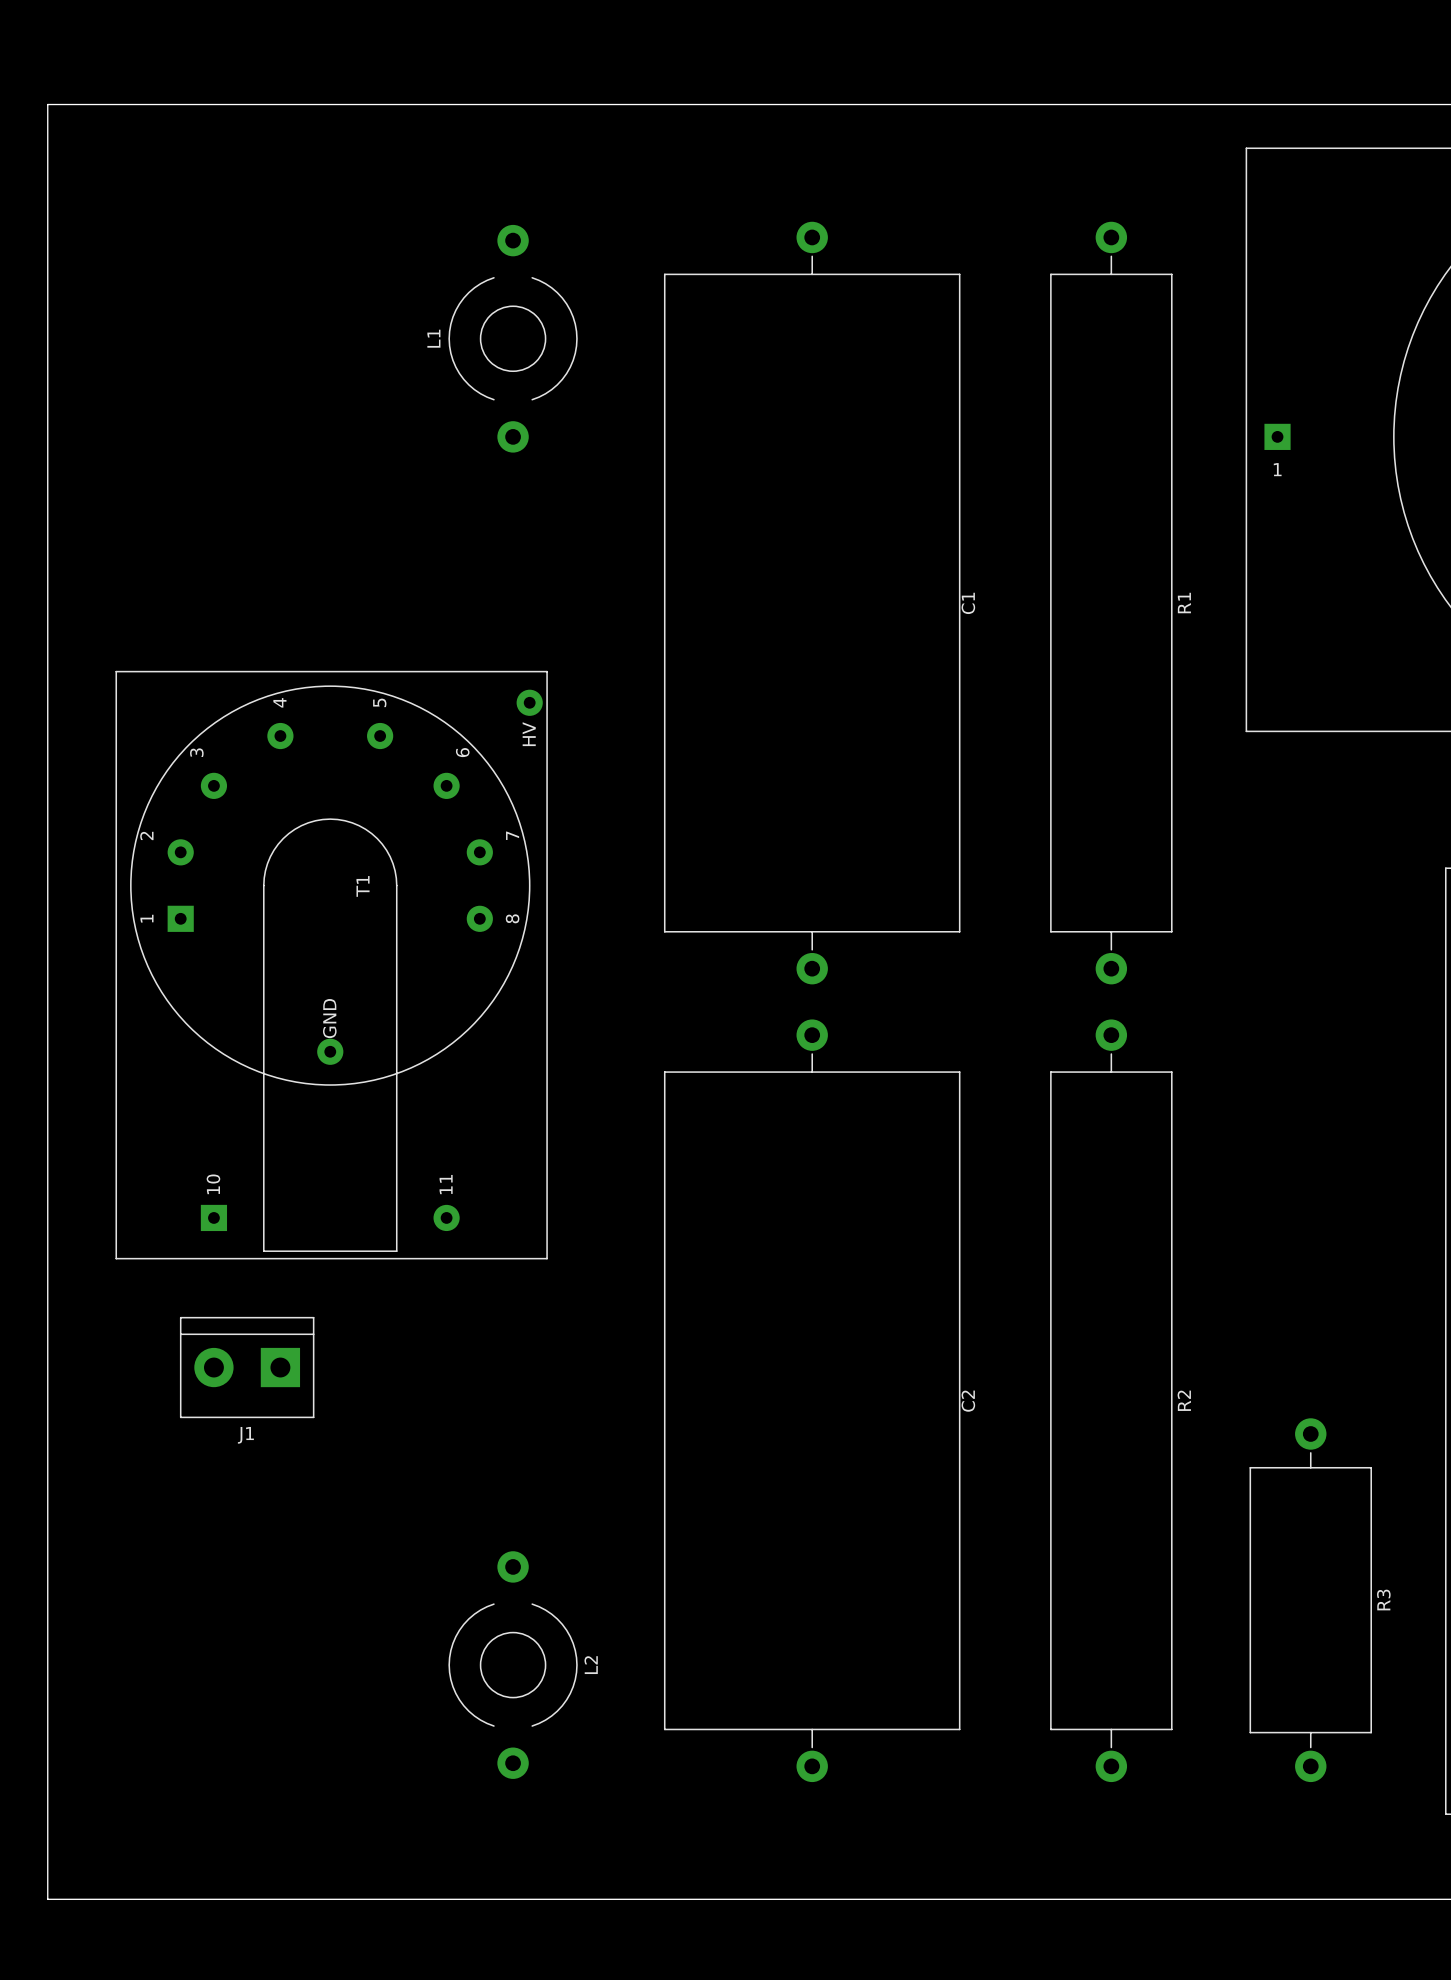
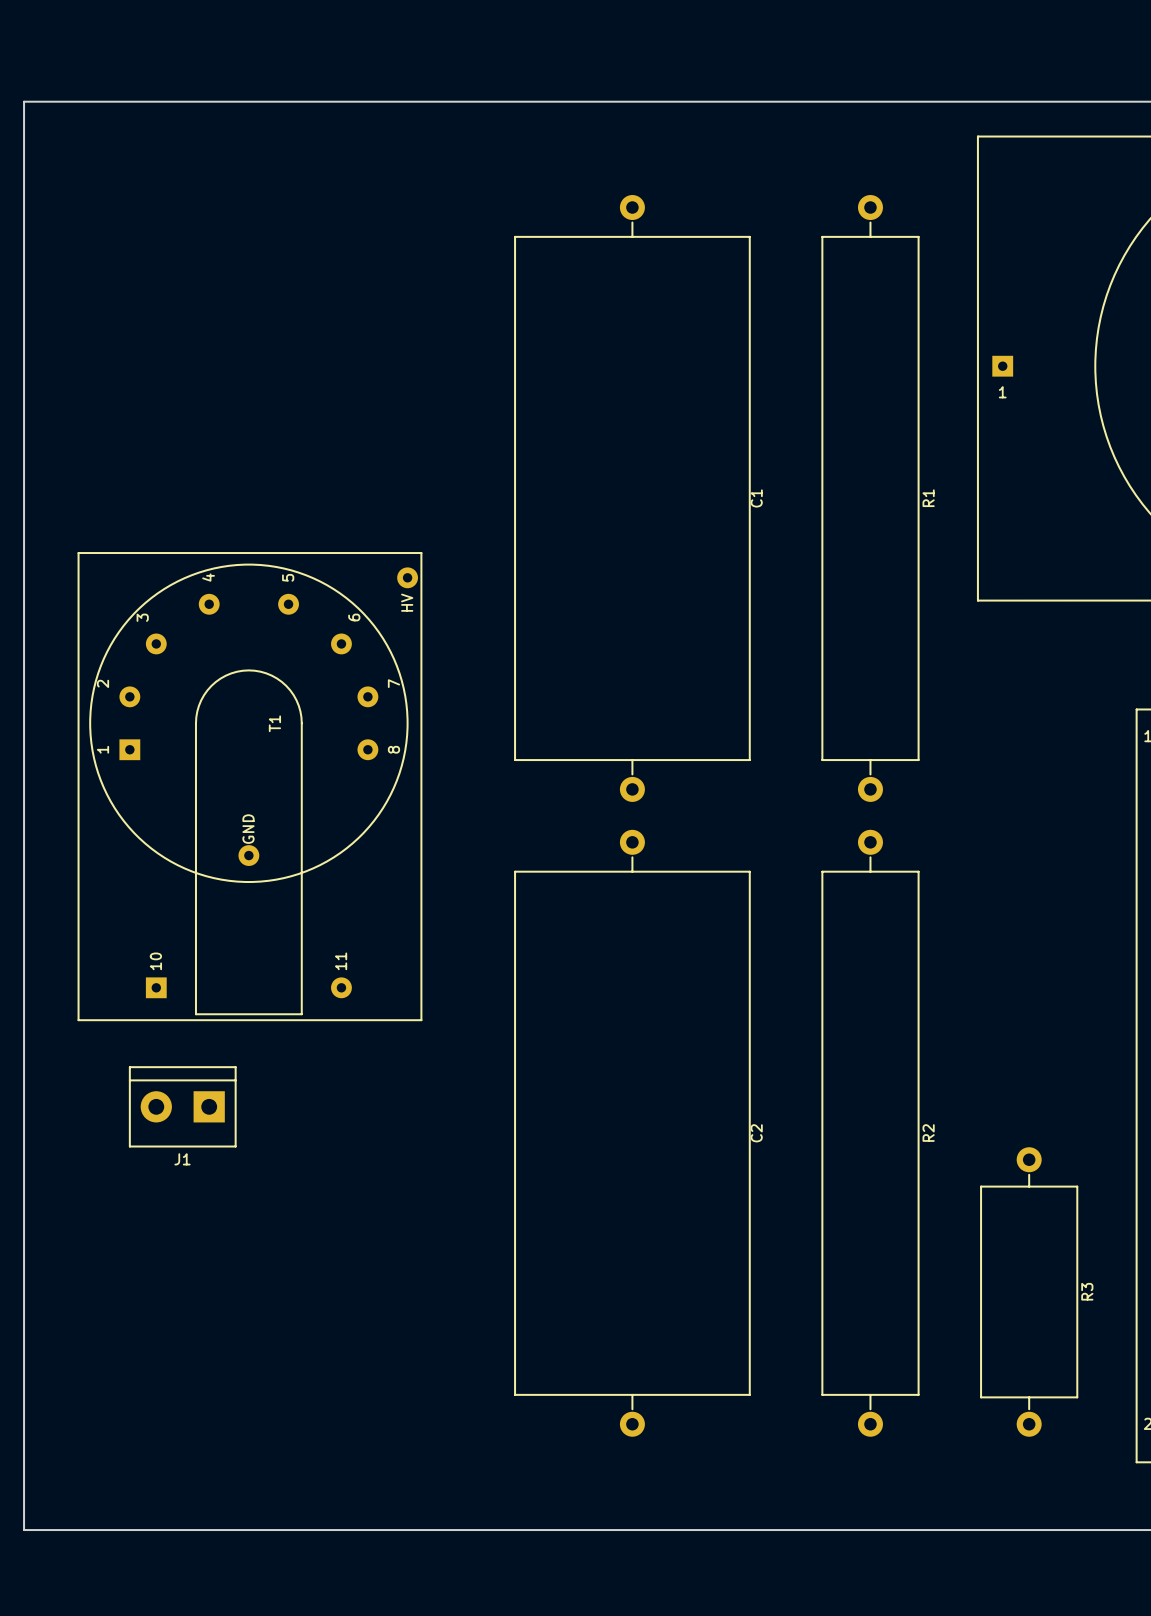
L1: (513, 338) -> none
L2: (513, 1665) -> none

